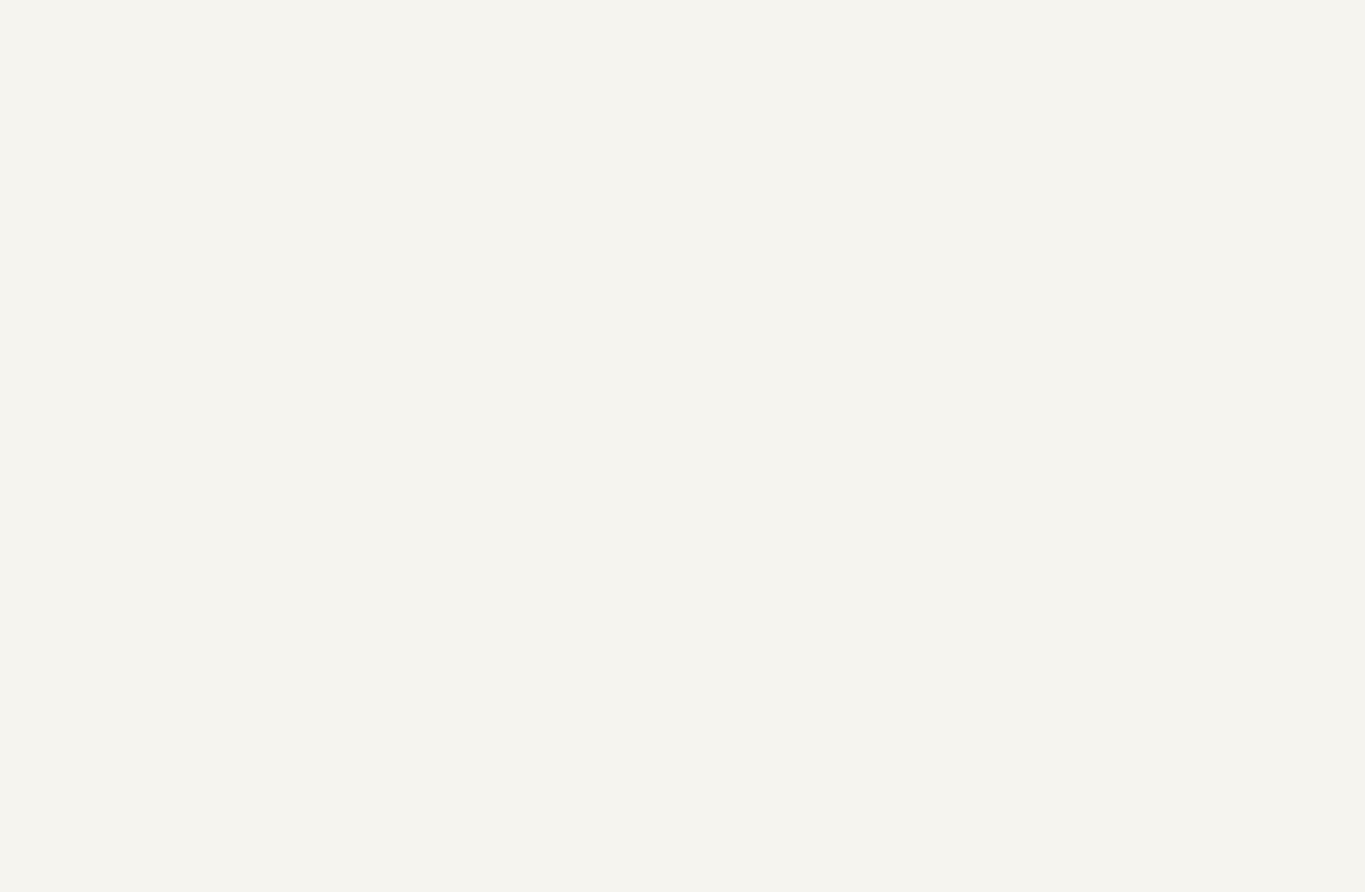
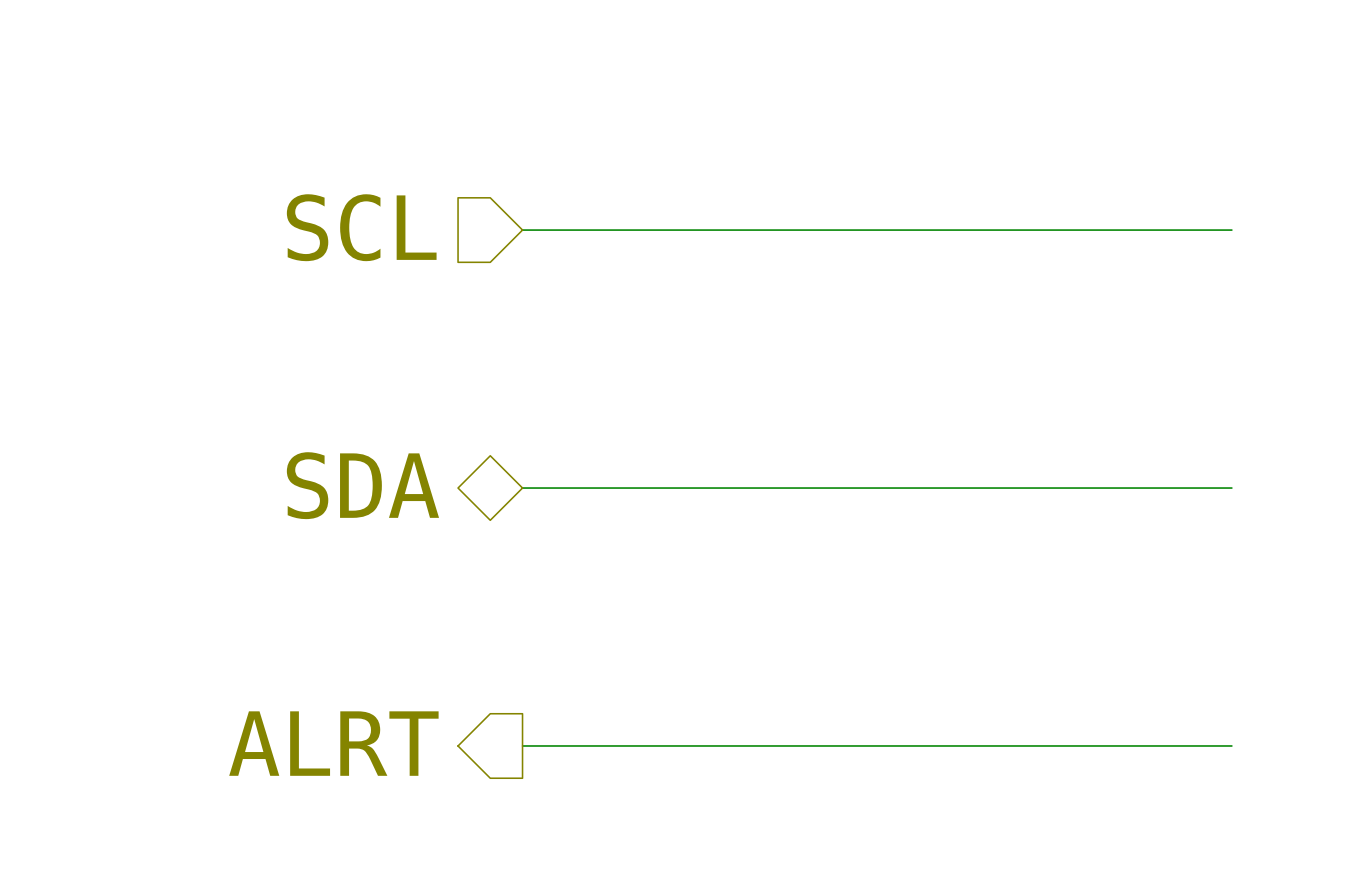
hierarchical label: none -> SCL (361, 227)
wire: none -> (522, 230) (1231, 230)
hierarchical label: none -> SDA (362, 485)
wire: none -> (522, 488) (1231, 488)
hierarchical label: none -> ALRT (333, 743)
wire: none -> (522, 745) (1231, 745)

